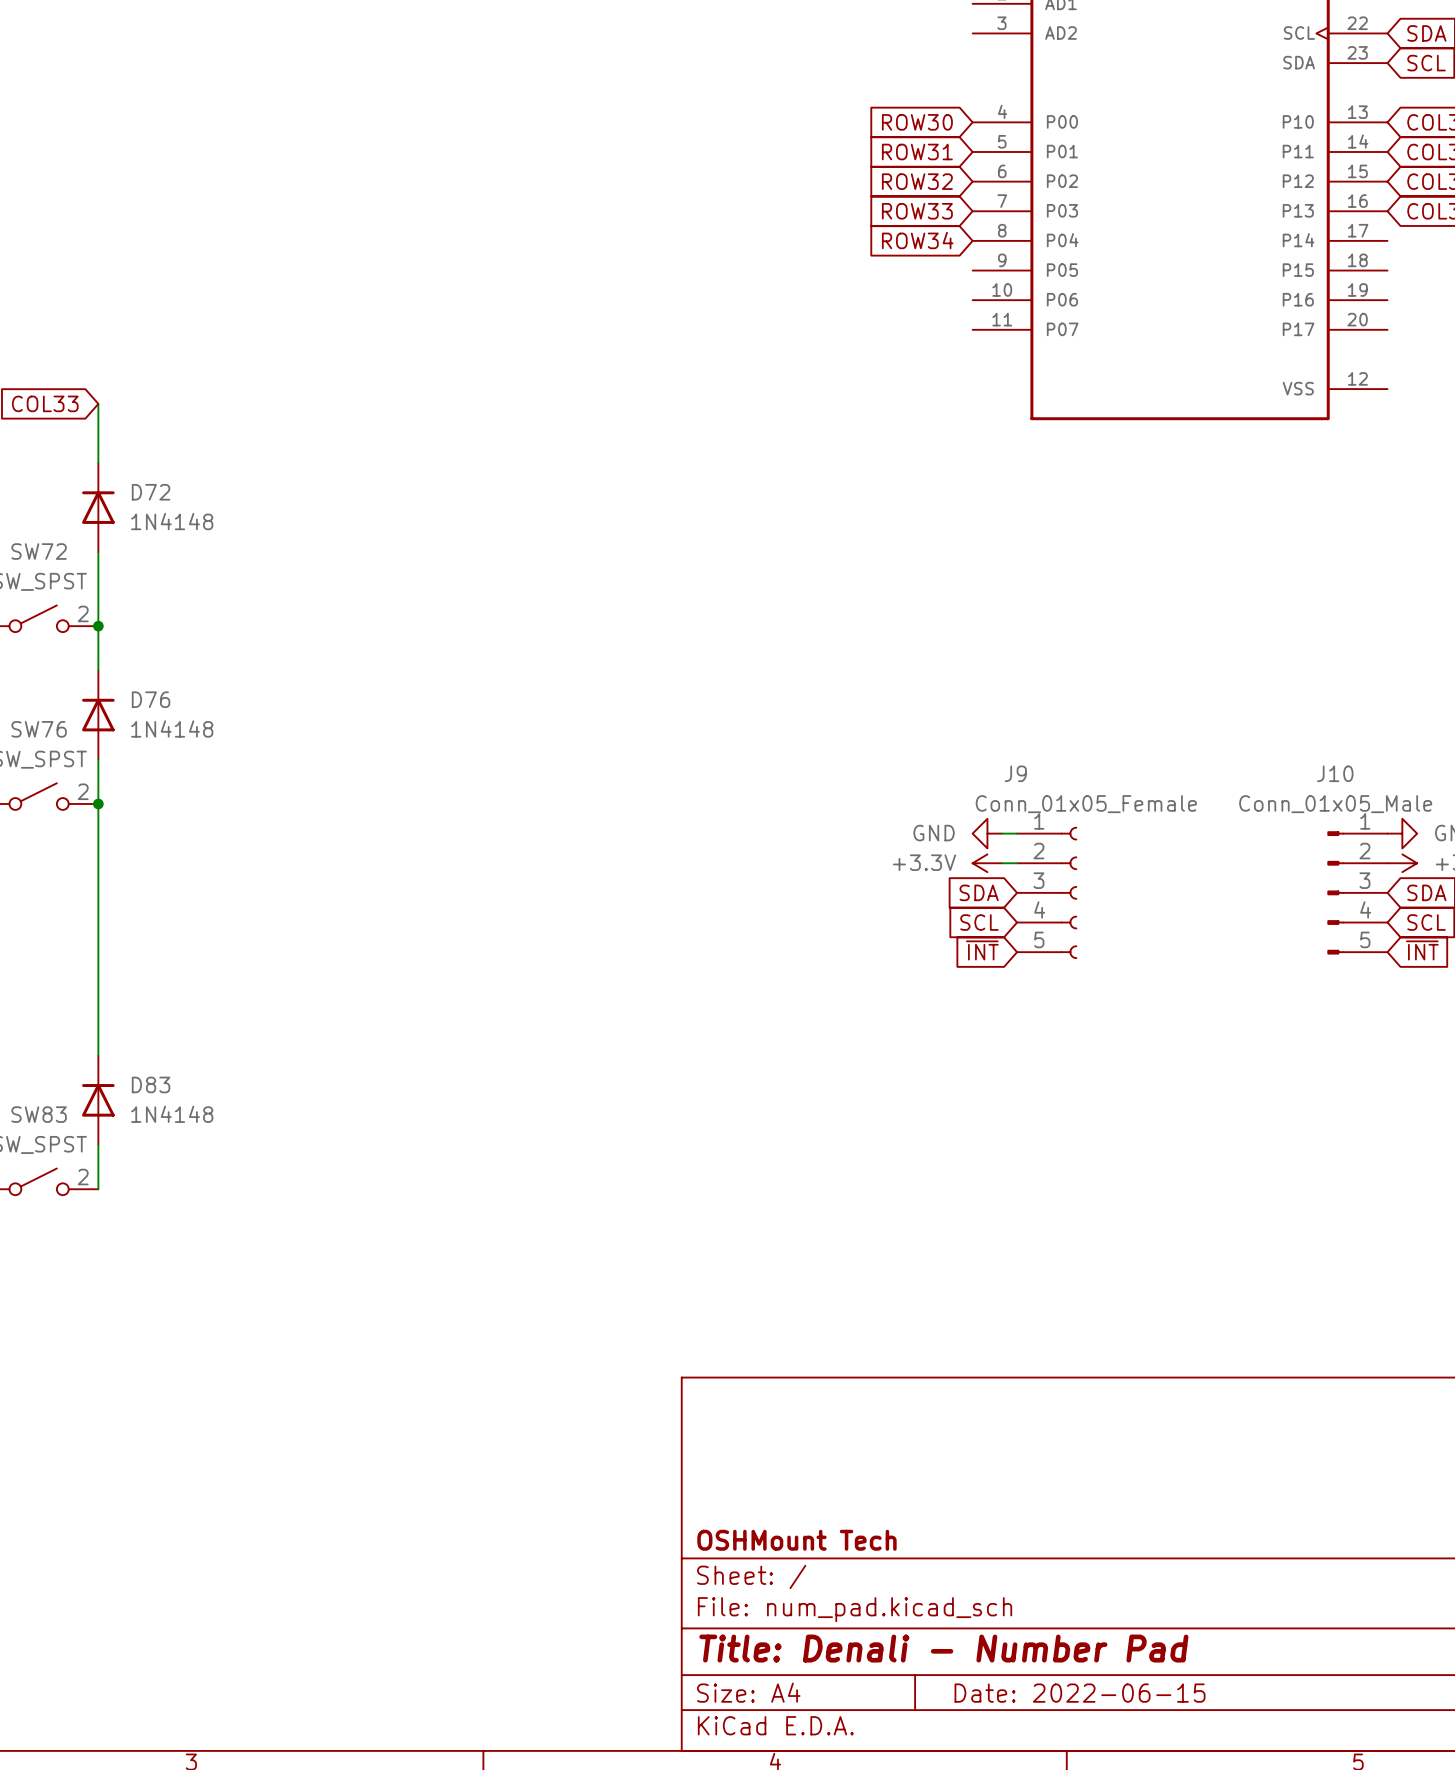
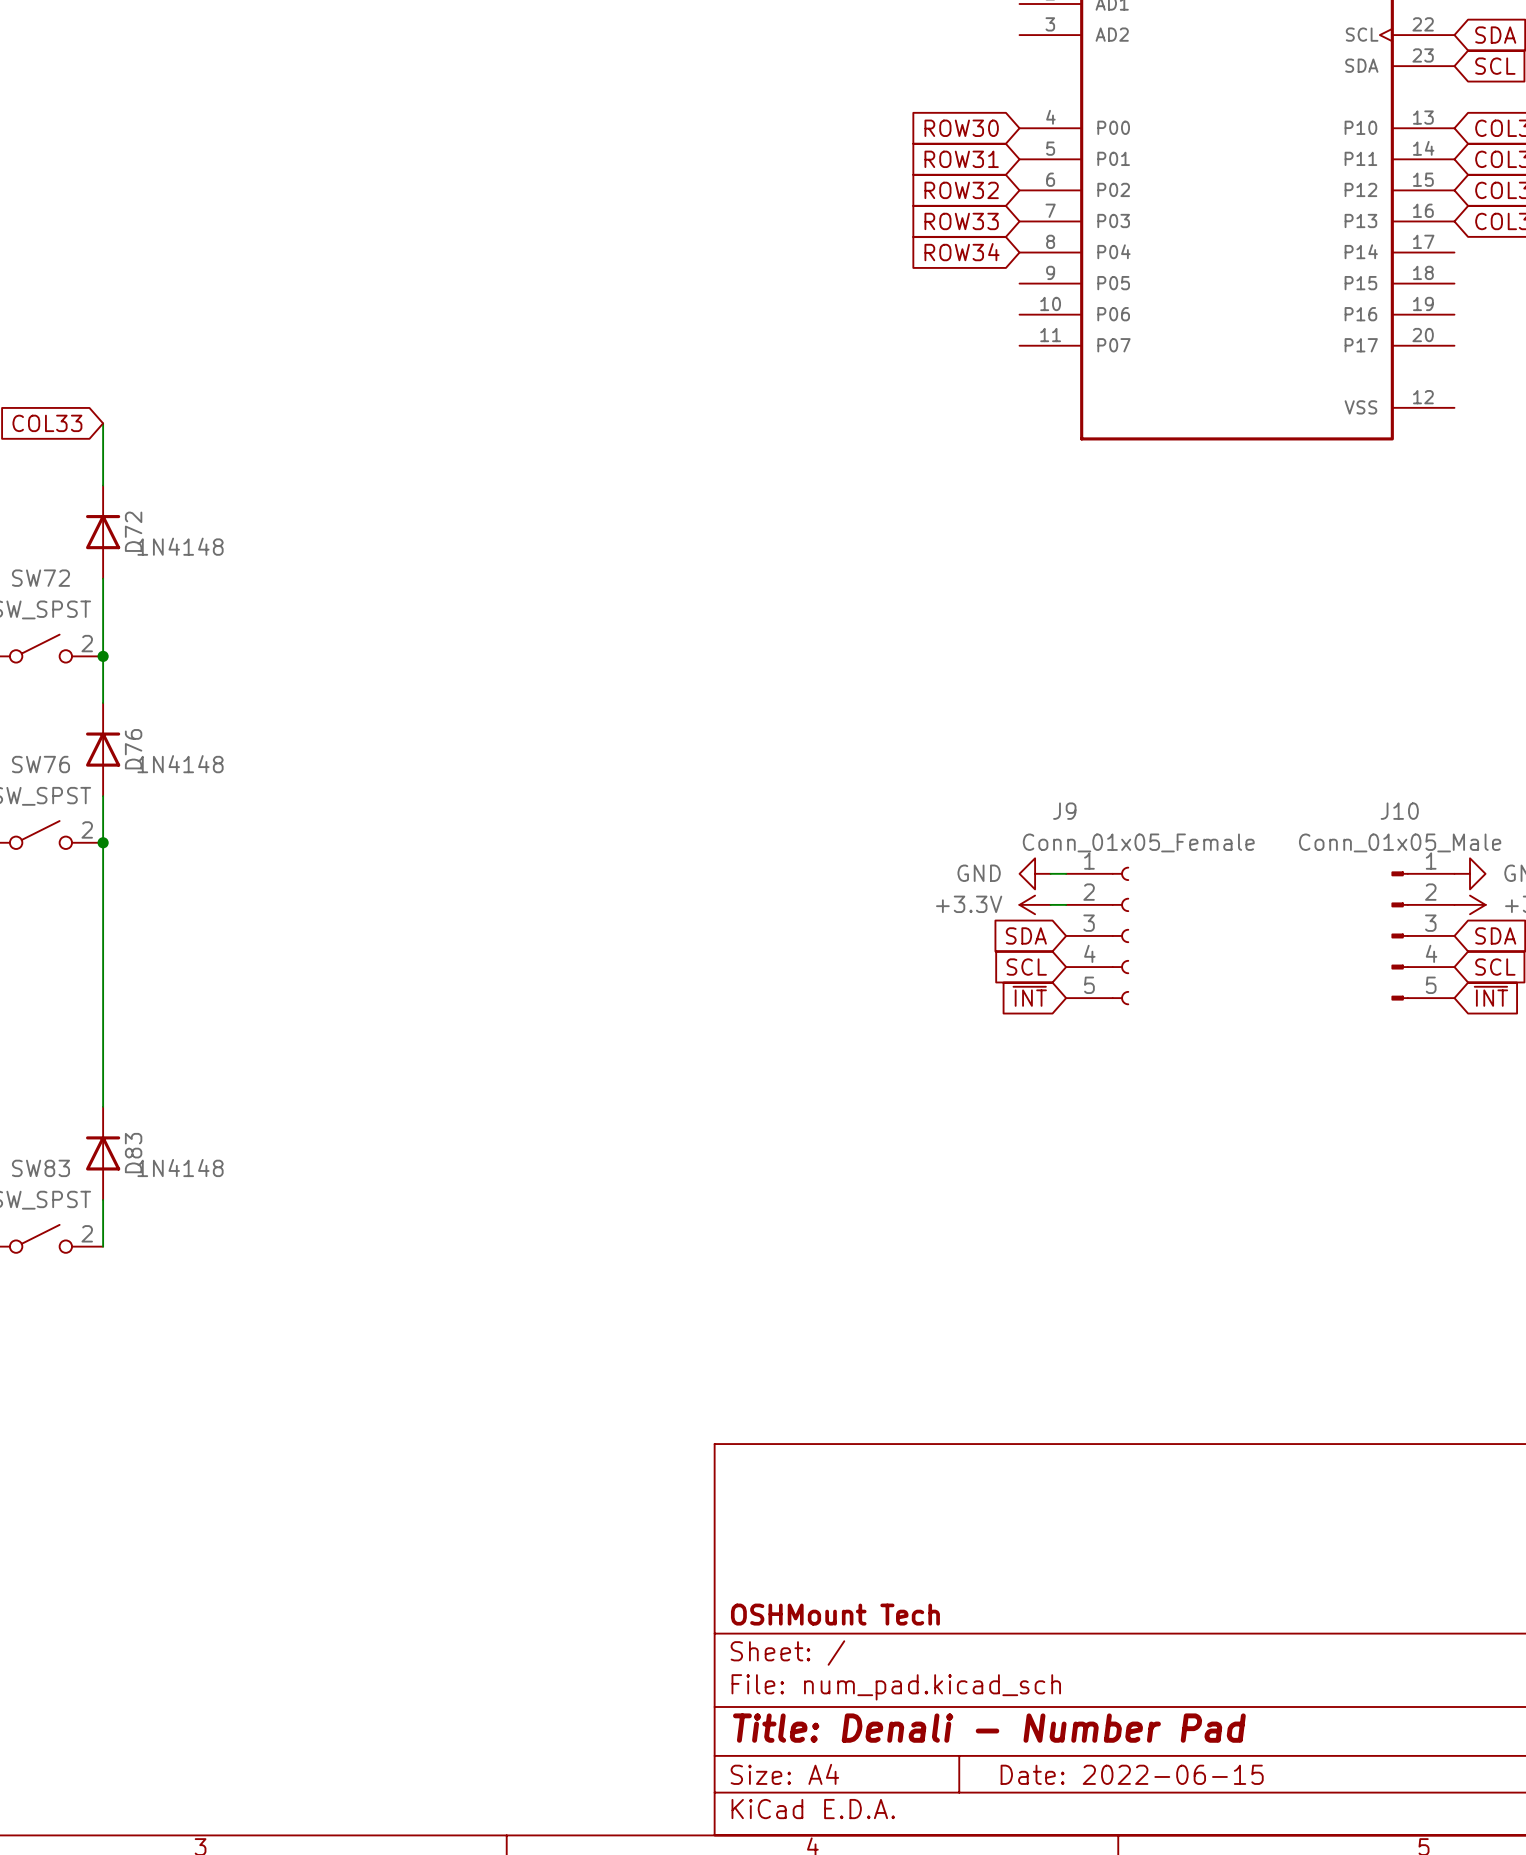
D72 name rotation: 0° (151, 492) -> 90° counterclockwise (133, 531)
D76 name rotation: 0° (151, 699) -> 90° counterclockwise (133, 749)
D83 name rotation: 0° (151, 1084) -> 90° counterclockwise (133, 1153)

